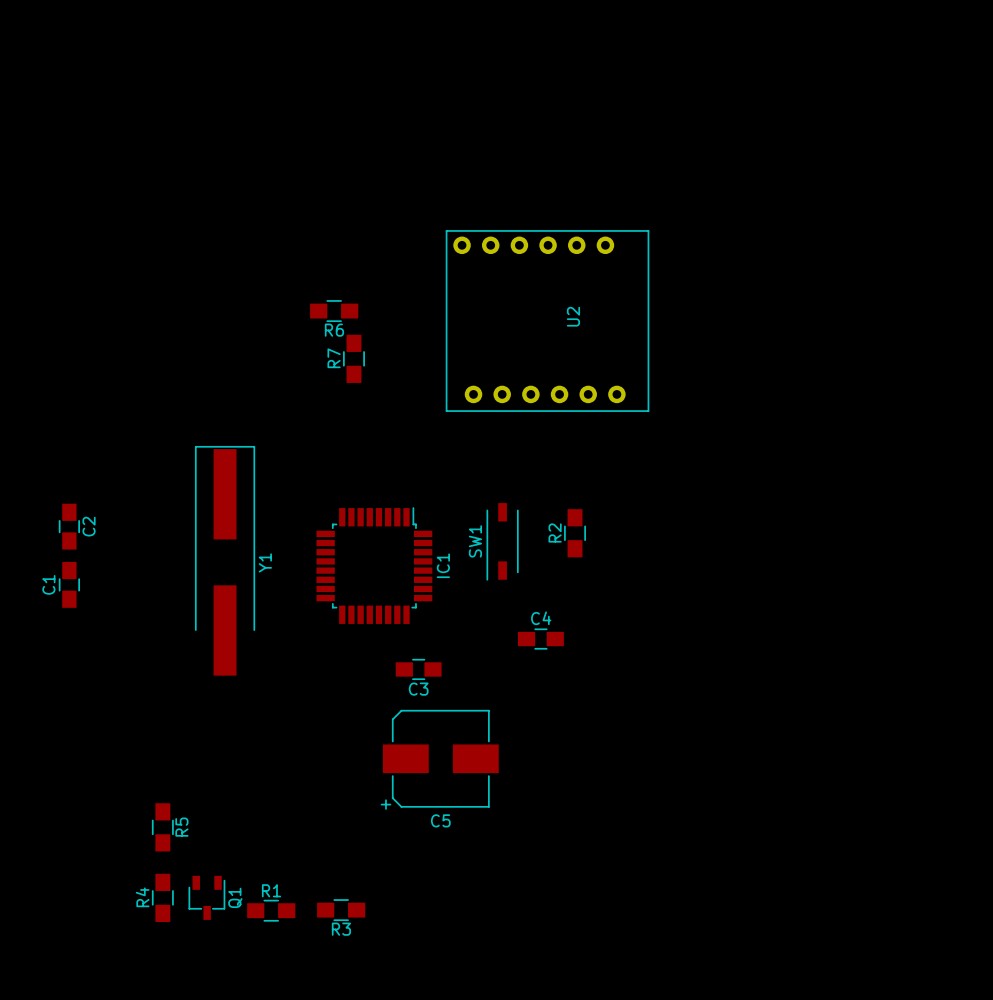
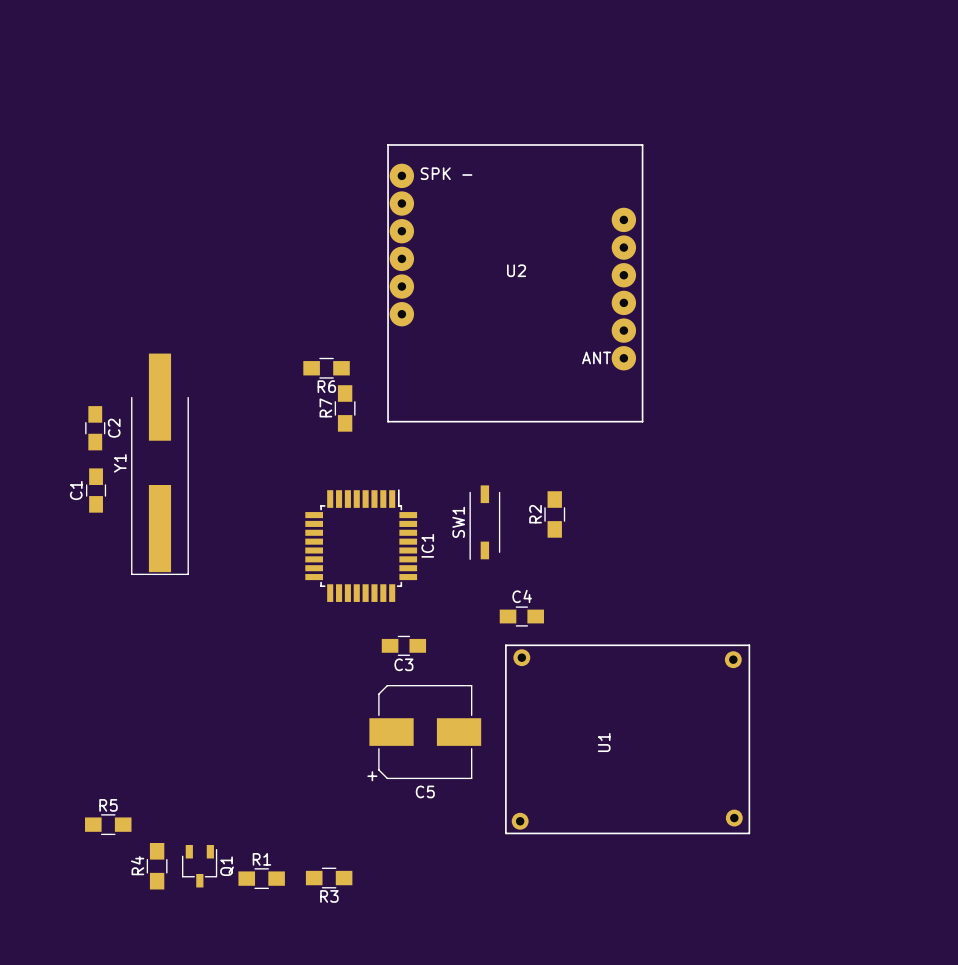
U2 footprint: [445, 230, 650, 412] -> [387, 144, 644, 423]
R6 position: (334, 311) -> (326, 368)
U2 name position: U2 (573, 316) -> U2 (516, 270)
R7 position: (353, 358) -> (345, 408)
C2 position: (69, 526) -> (95, 428)
Y1 rotation: 0° (225, 560) -> 180° (159, 464)
C1 position: (69, 584) -> (96, 490)
U1: none -> (627, 739)
R5 rotation: 0° (162, 827) -> 90° clockwise (108, 824)
R5 position: (162, 827) -> (108, 824)
R5 name position: R5 (181, 827) -> R5 (108, 805)

